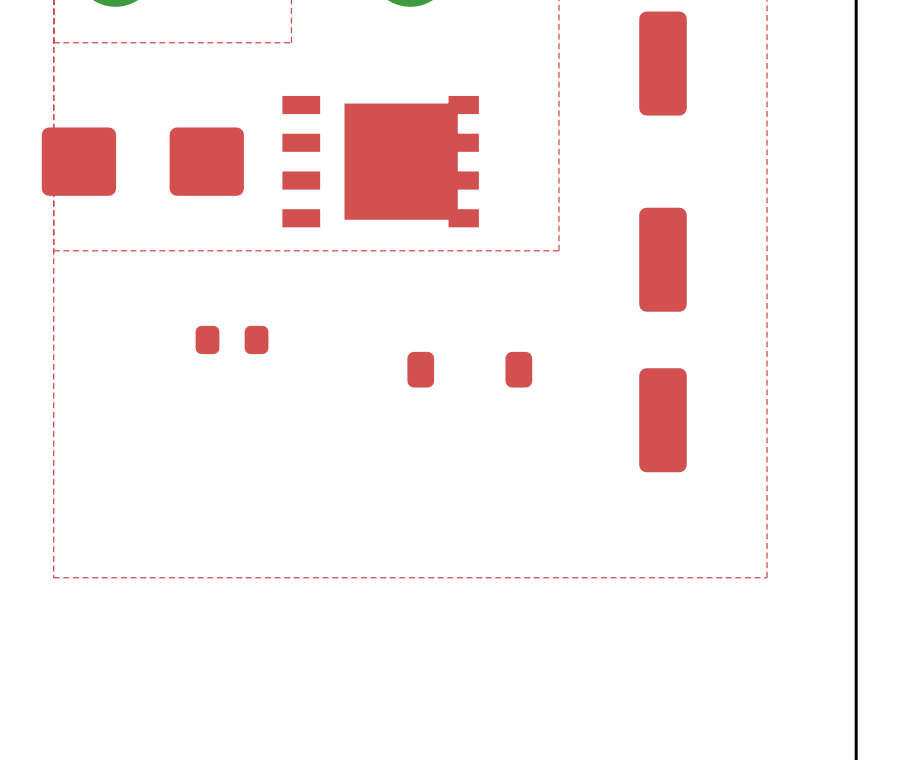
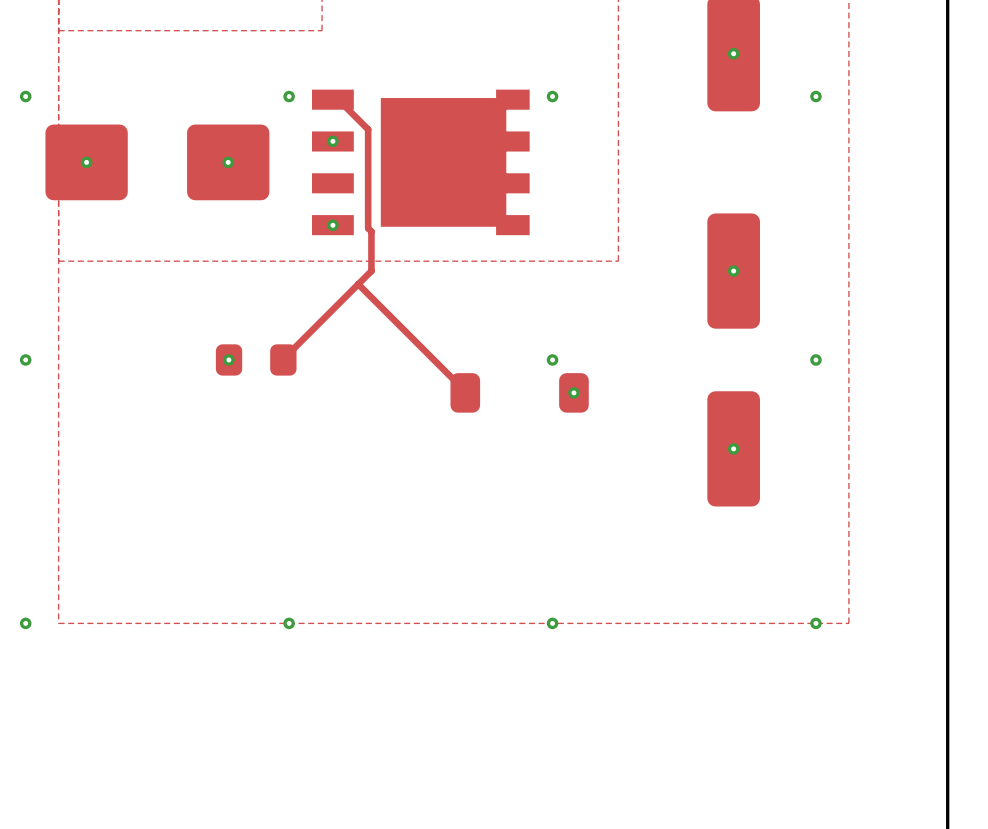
via: none -> (733, 53)
via: none -> (25, 96)
via: none -> (289, 96)
via: none -> (552, 96)
via: none -> (815, 96)
top track: none -> (331, 99) (338, 99) (368, 129) (368, 228) (371, 231) (371, 271) (282, 359)
via: none -> (332, 141)
via: none -> (86, 162)
via: none -> (228, 162)
via: none -> (332, 225)
via: none -> (733, 271)
top track: none -> (358, 284) (466, 392)
via: none -> (25, 359)
via: none -> (228, 359)
via: none -> (552, 359)
via: none -> (815, 359)
via: none -> (573, 392)
via: none -> (733, 448)
via: none -> (25, 623)
via: none -> (289, 623)
via: none -> (552, 623)
via: none -> (815, 623)

